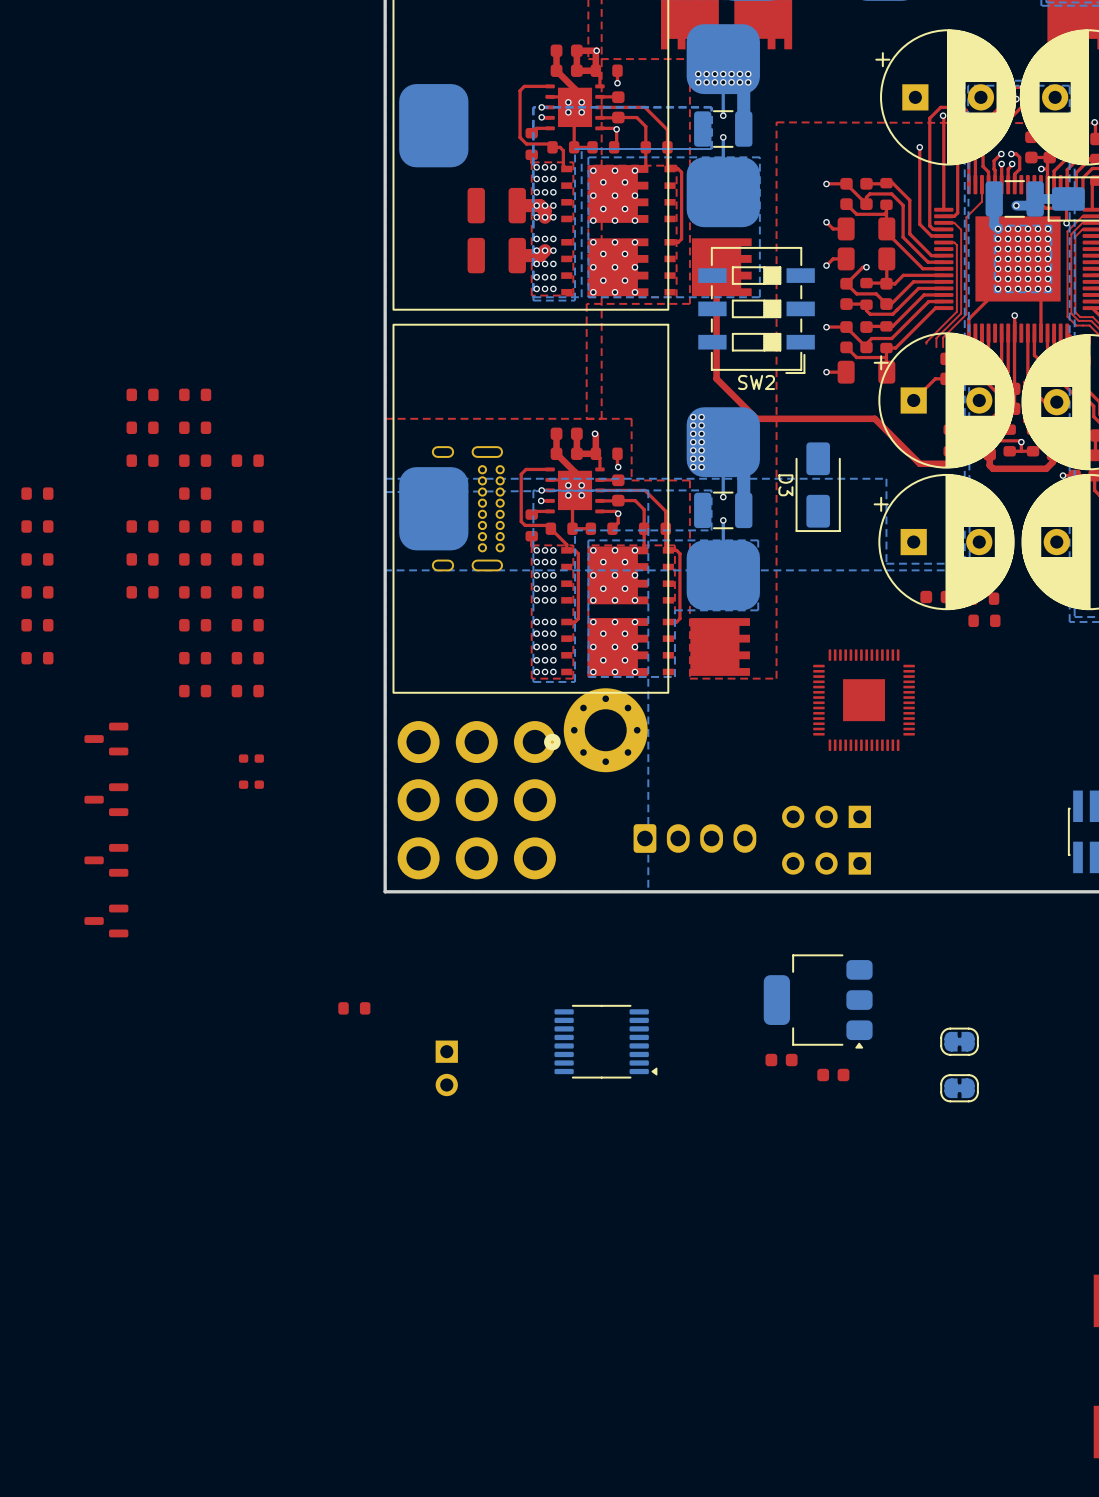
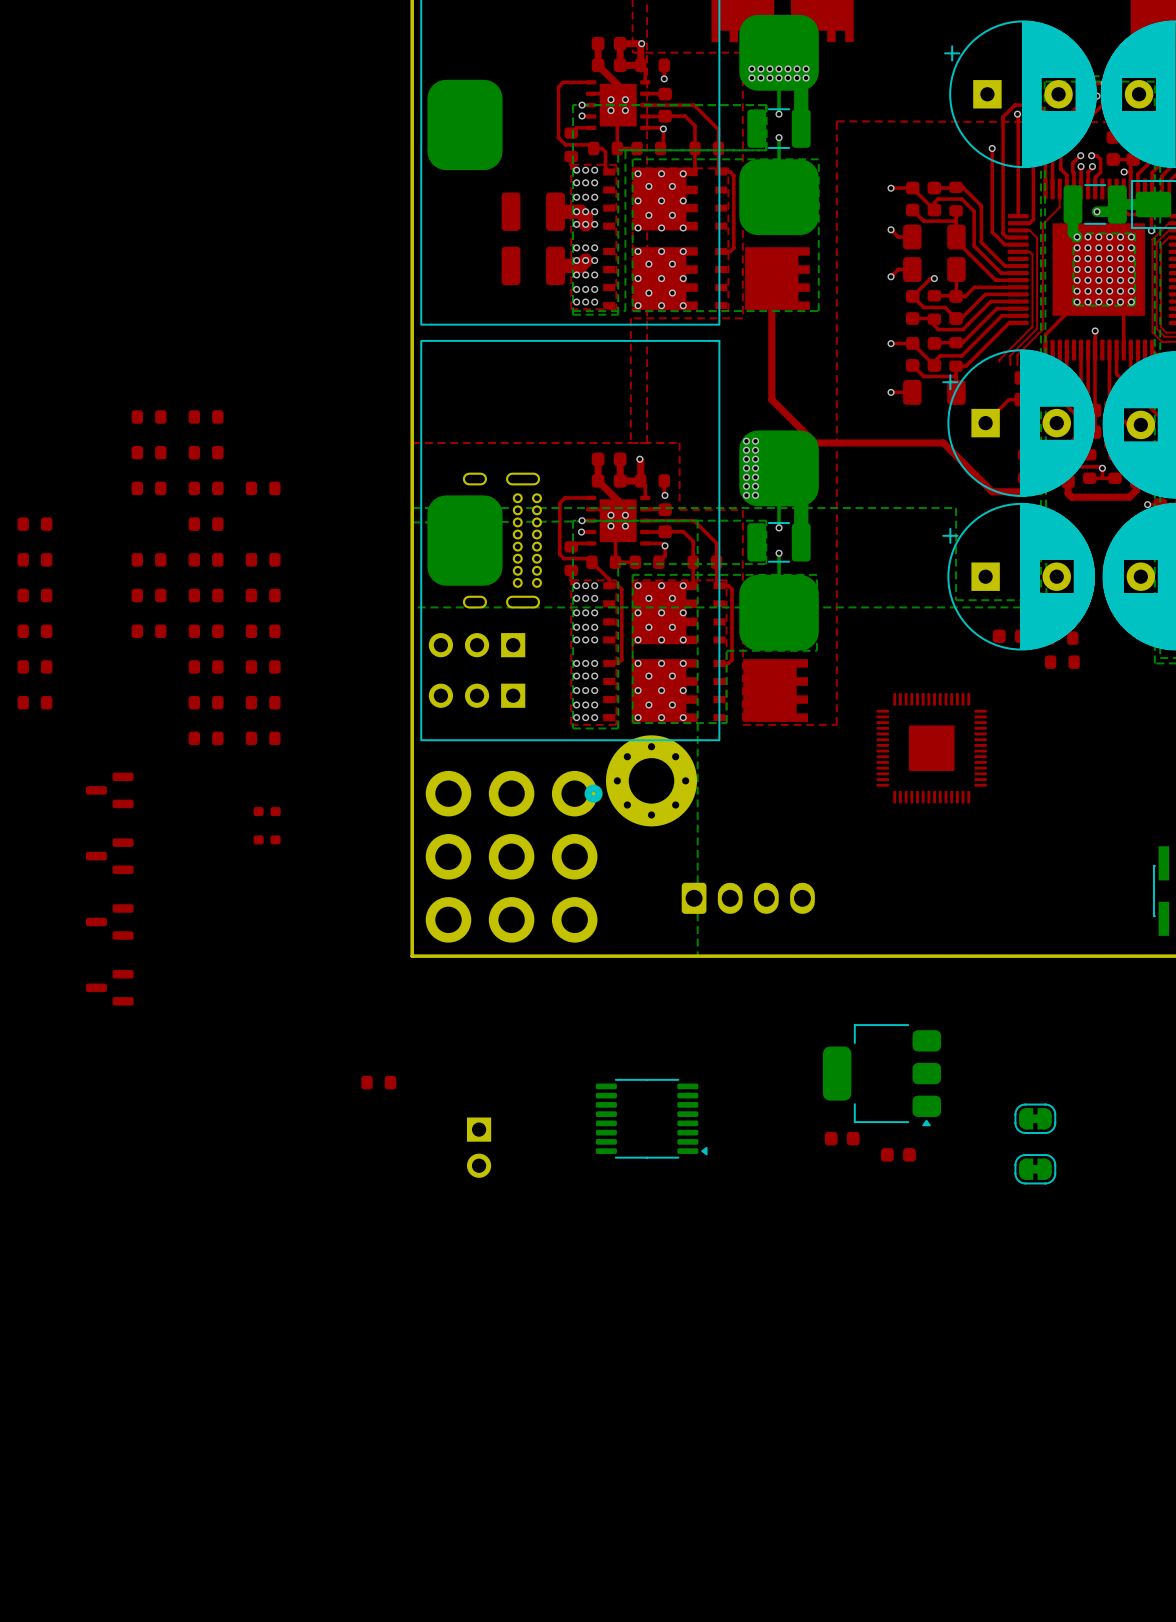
SW2: (756, 310) -> none
D3: (818, 487) -> none
part: none -> (477, 645)
part: none -> (477, 695)
part: (826, 816) -> none
part: (826, 863) -> none

